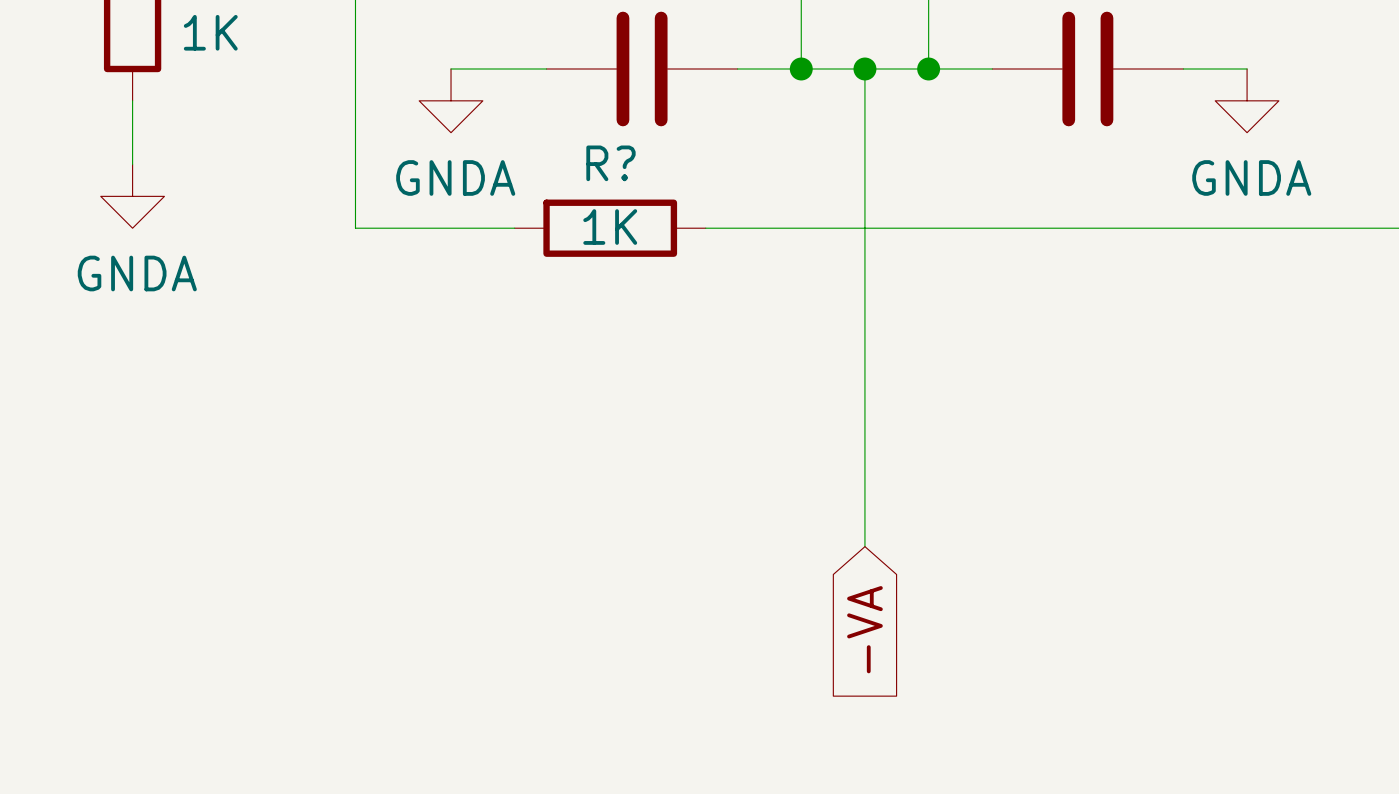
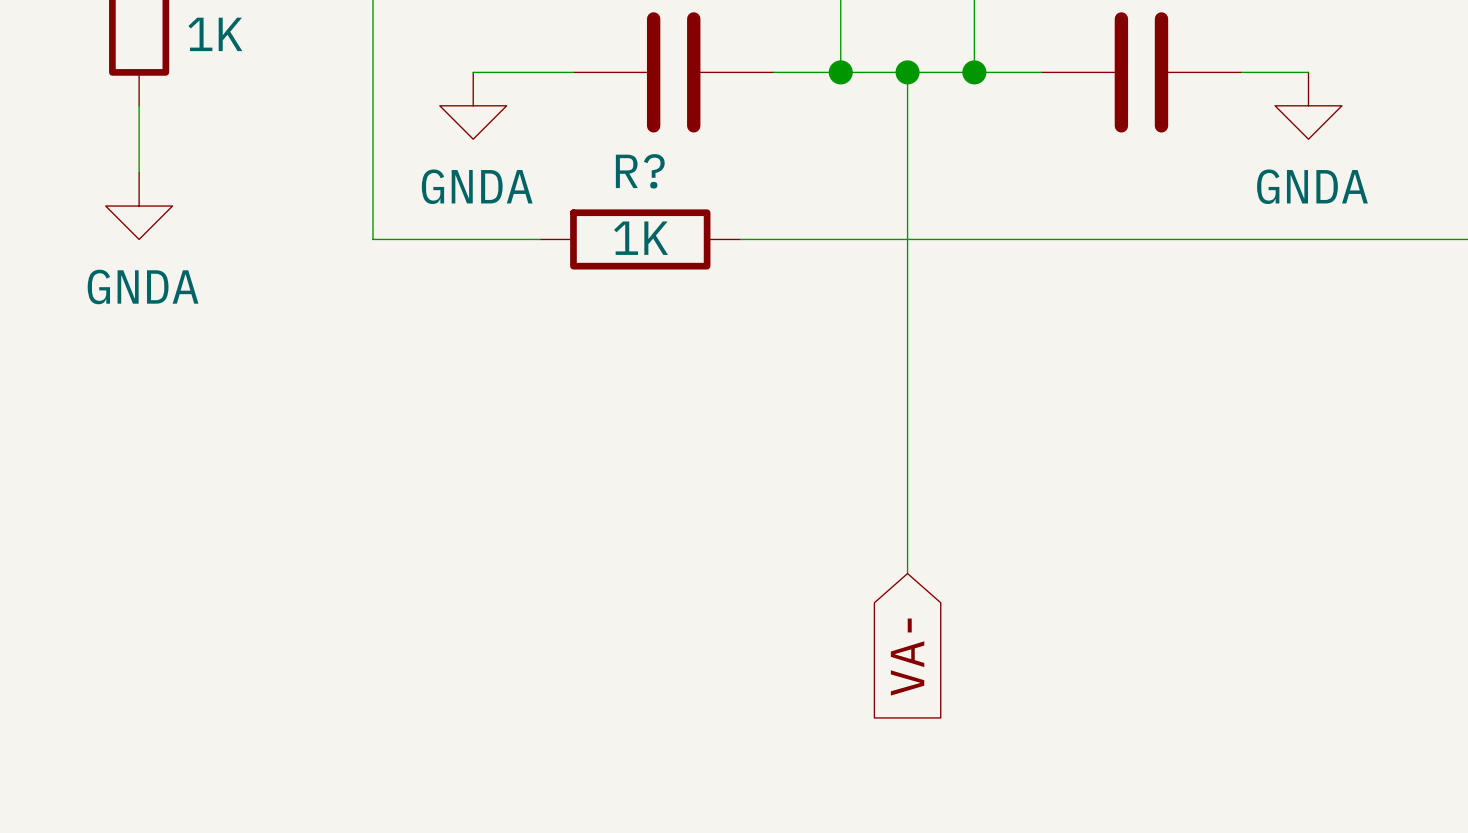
global label: -VA (864, 629) -> VA- (907, 657)

